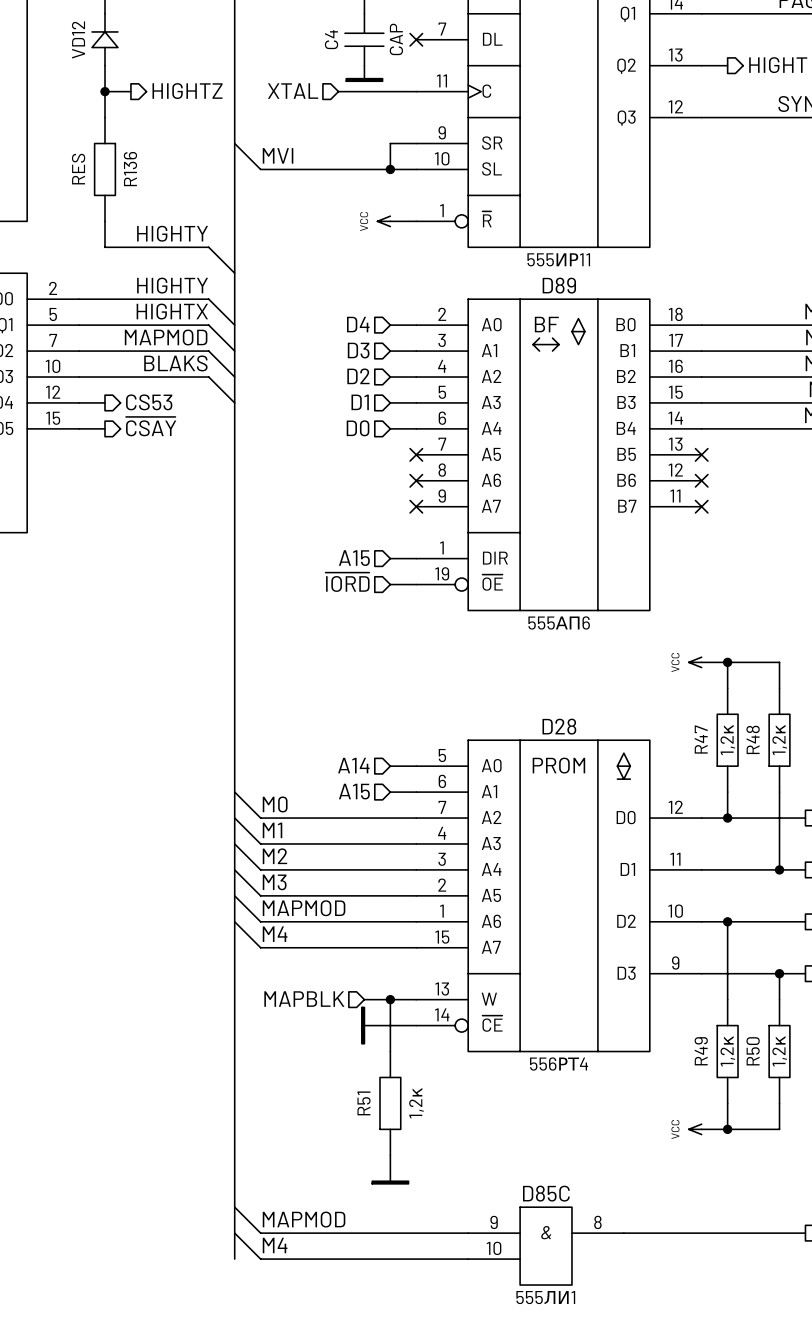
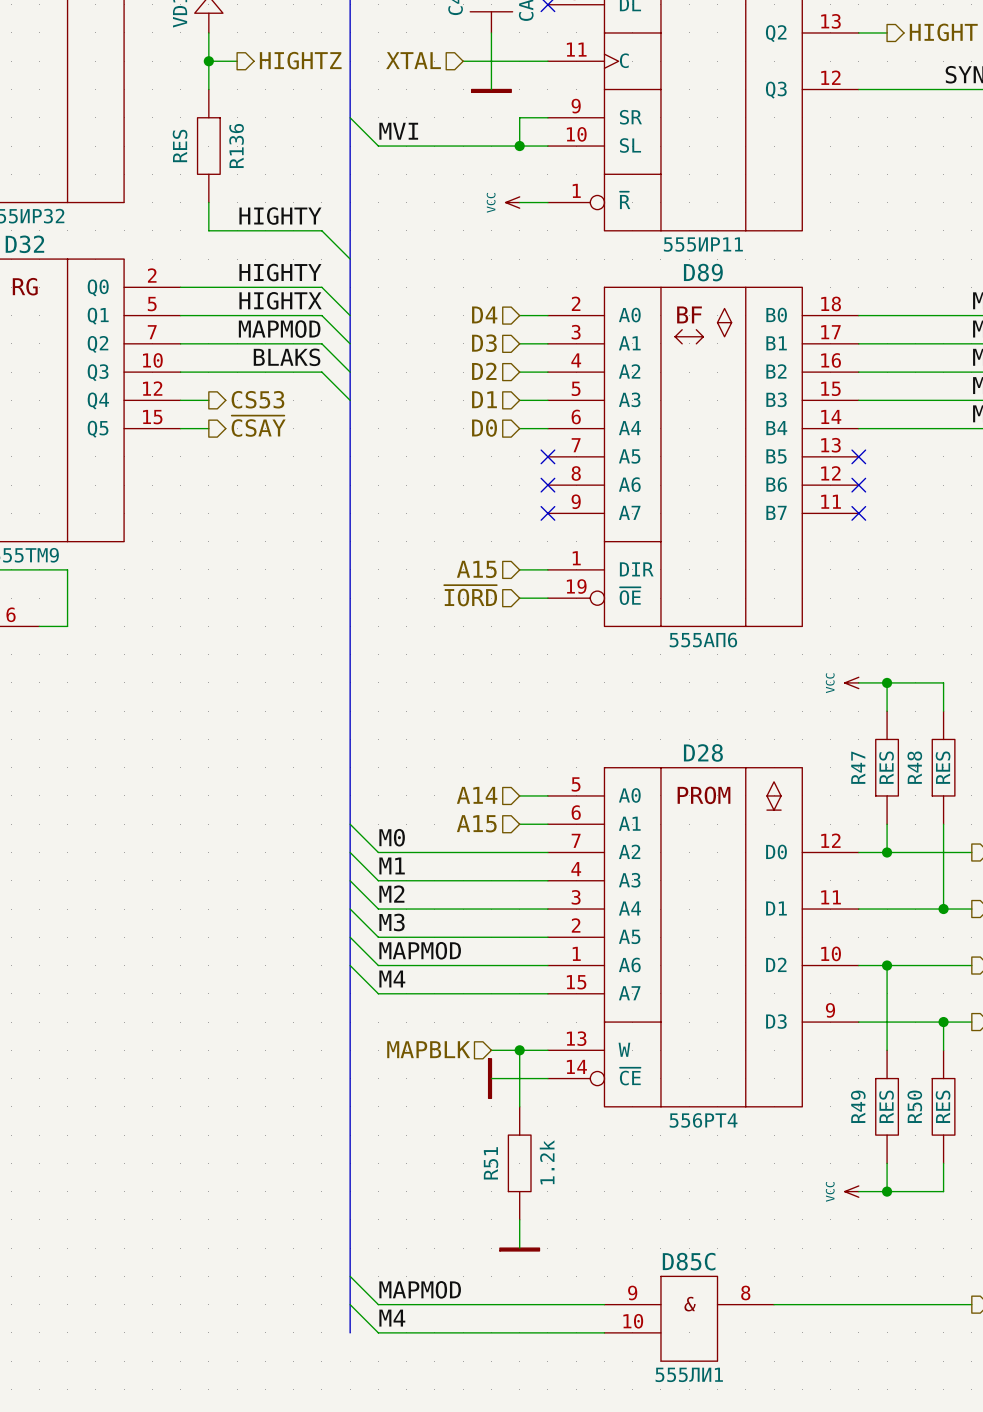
wire: none -> (491, 47) (491, 89)
power symbol position: (364, 79) -> (491, 90)
R47 value: 1,2к (727, 739) -> RES (886, 767)
R48 value: 1,2к (779, 739) -> RES (943, 767)
R49 value: 1,2к (727, 1051) -> RES (886, 1106)
R50 value: 1,2к (779, 1051) -> RES (943, 1106)
R51 value: 1,2к (416, 1103) -> 1.2k (547, 1162)

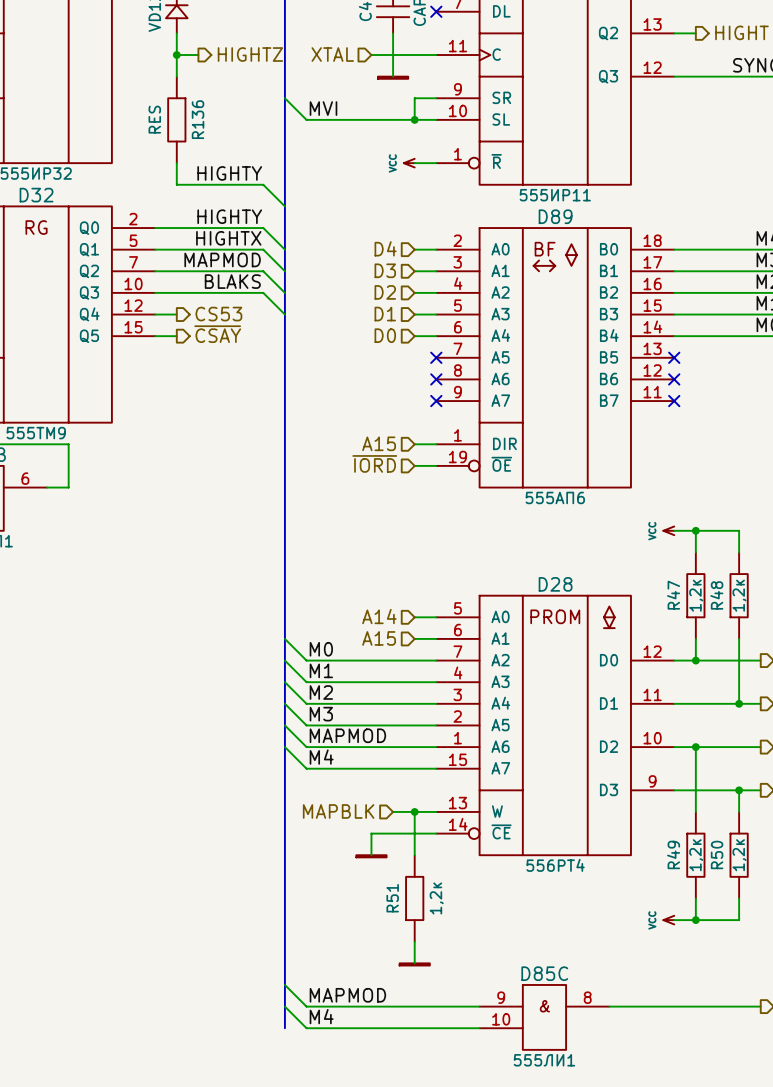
R47 value: RES (886, 767) -> 1,2к (696, 595)
R48 value: RES (943, 767) -> 1,2к (739, 595)
power symbol rotation: 0° (490, 1078) -> 90° clockwise (371, 856)
power symbol position: (490, 1078) -> (371, 856)
wire: none -> (393, 833) (371, 833) (371, 855)
R49 value: RES (886, 1106) -> 1,2к (696, 855)
R50 value: RES (943, 1106) -> 1,2к (739, 855)
R51 value: 1.2k (547, 1162) -> 1,2к (436, 898)

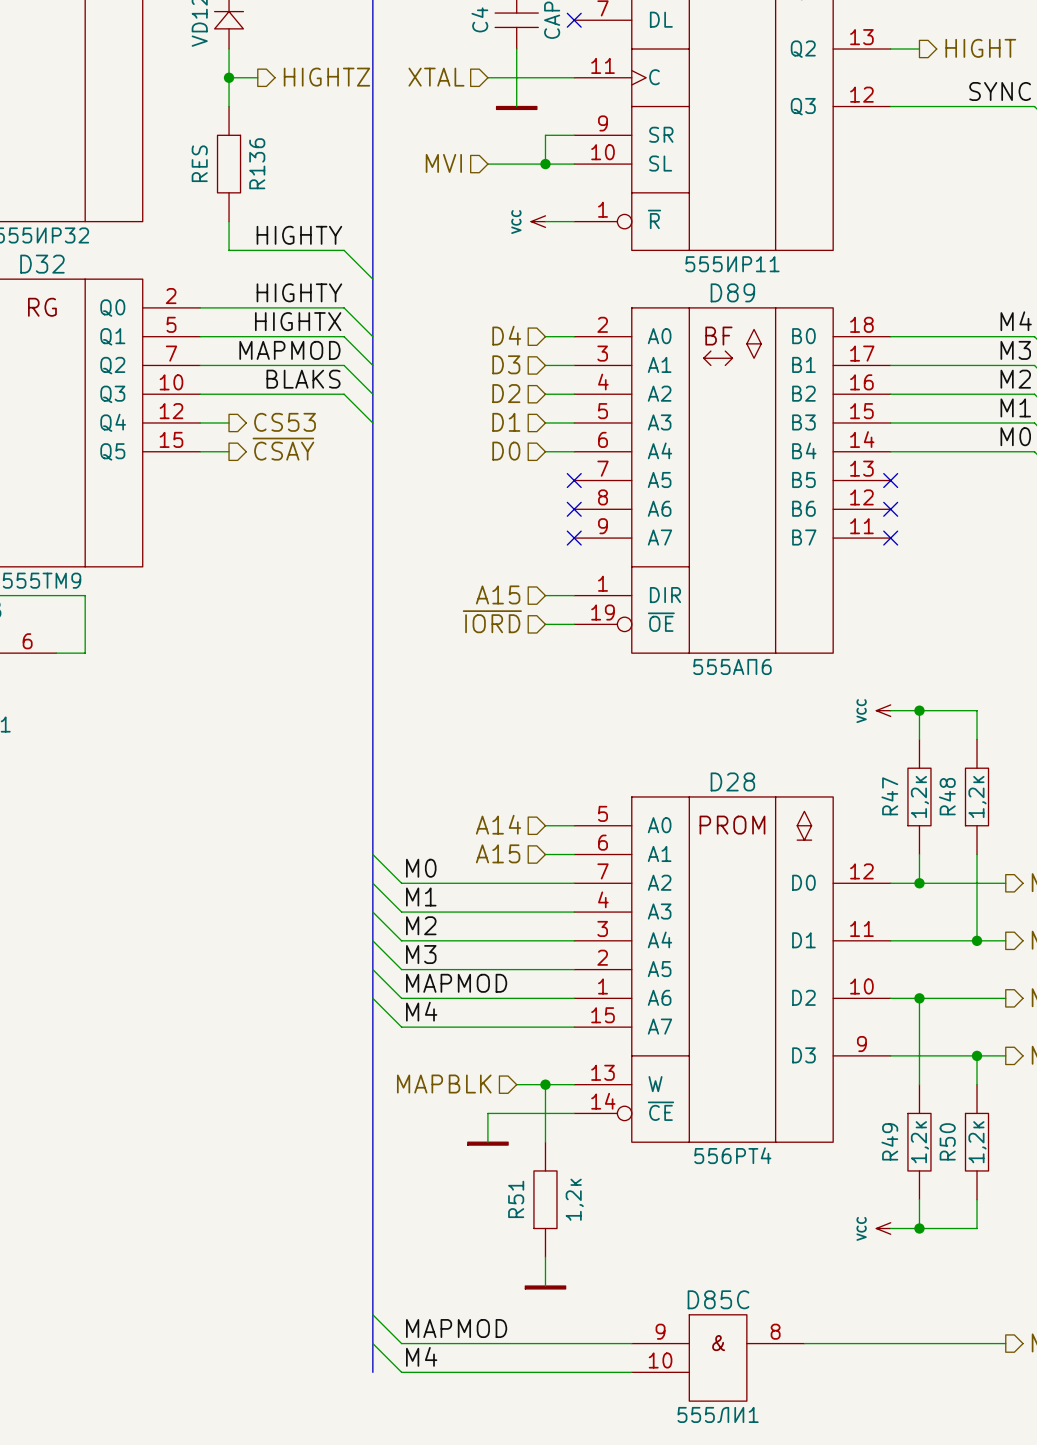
wire: (284, 98) (306, 119) (371, 119) -> none
label: MVI (323, 108) -> none
hierarchical label: none -> MVI (443, 163)

